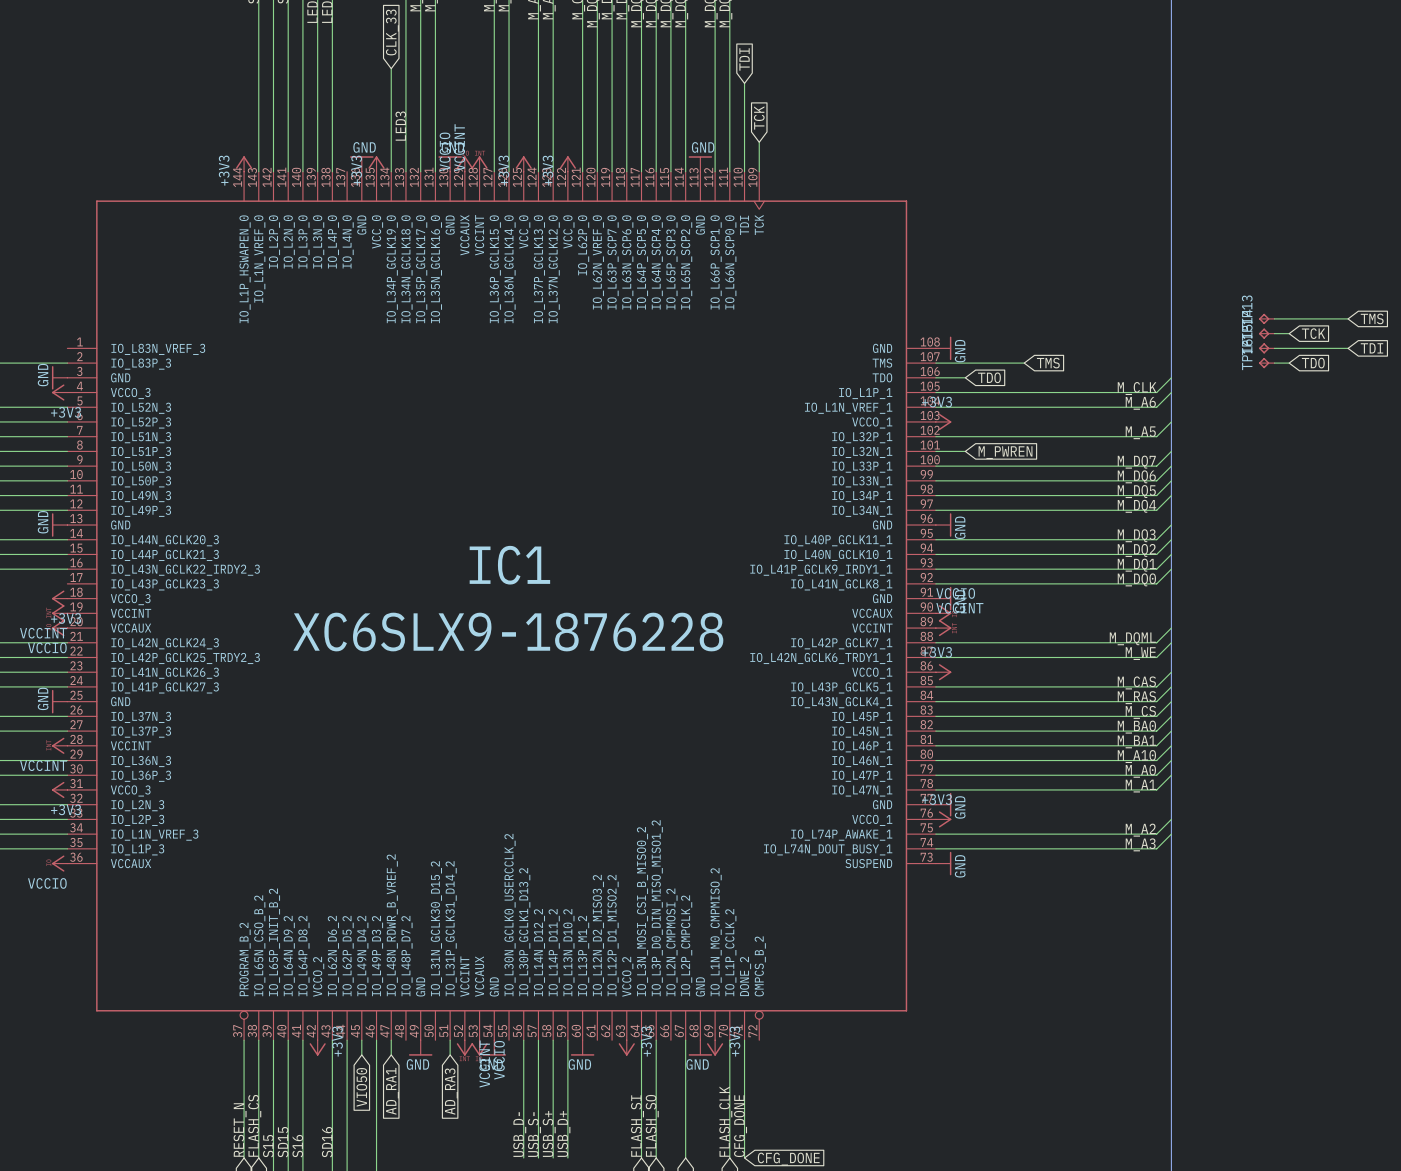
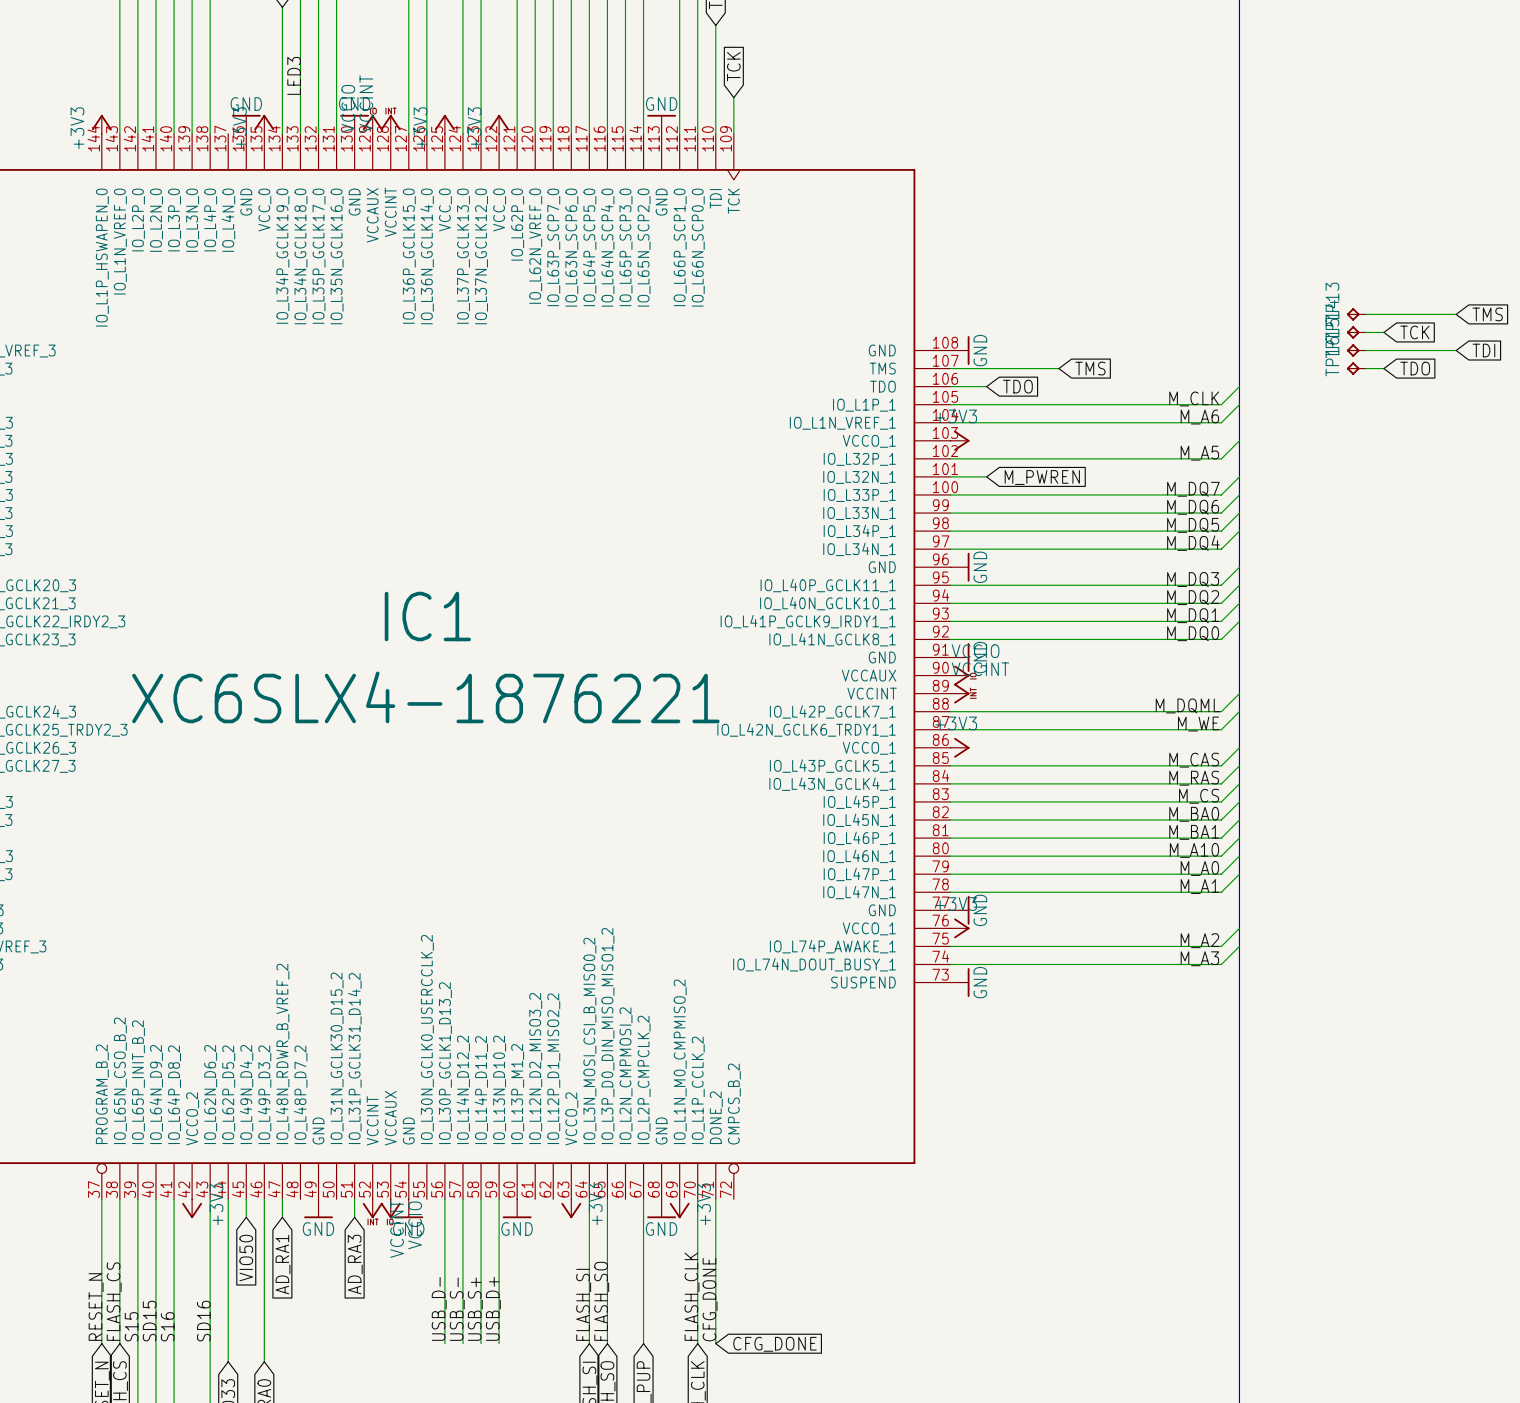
IC1 value: XC6SLX9-1876228 (508, 632) -> XC6SLX4-1876221 (425, 697)

